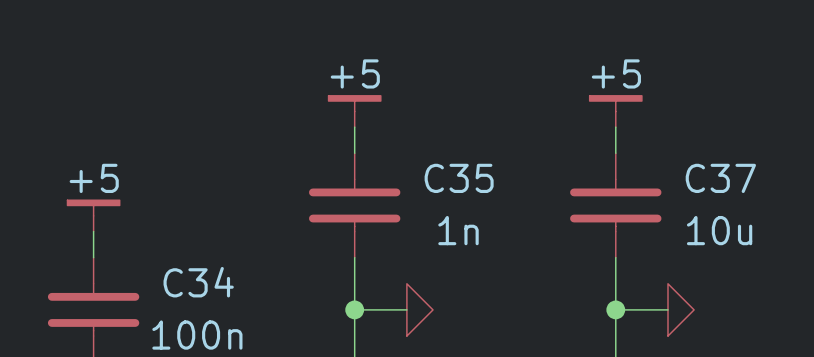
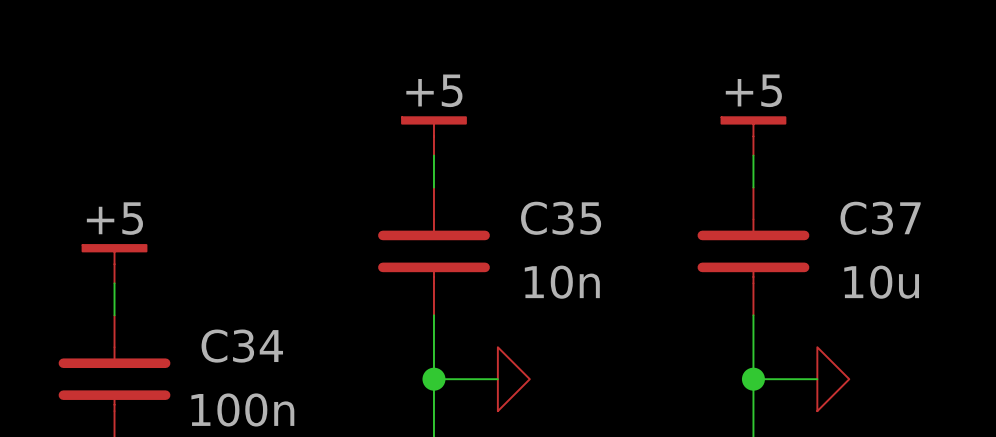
C35 value: 1n (458, 230) -> 10n (562, 282)

